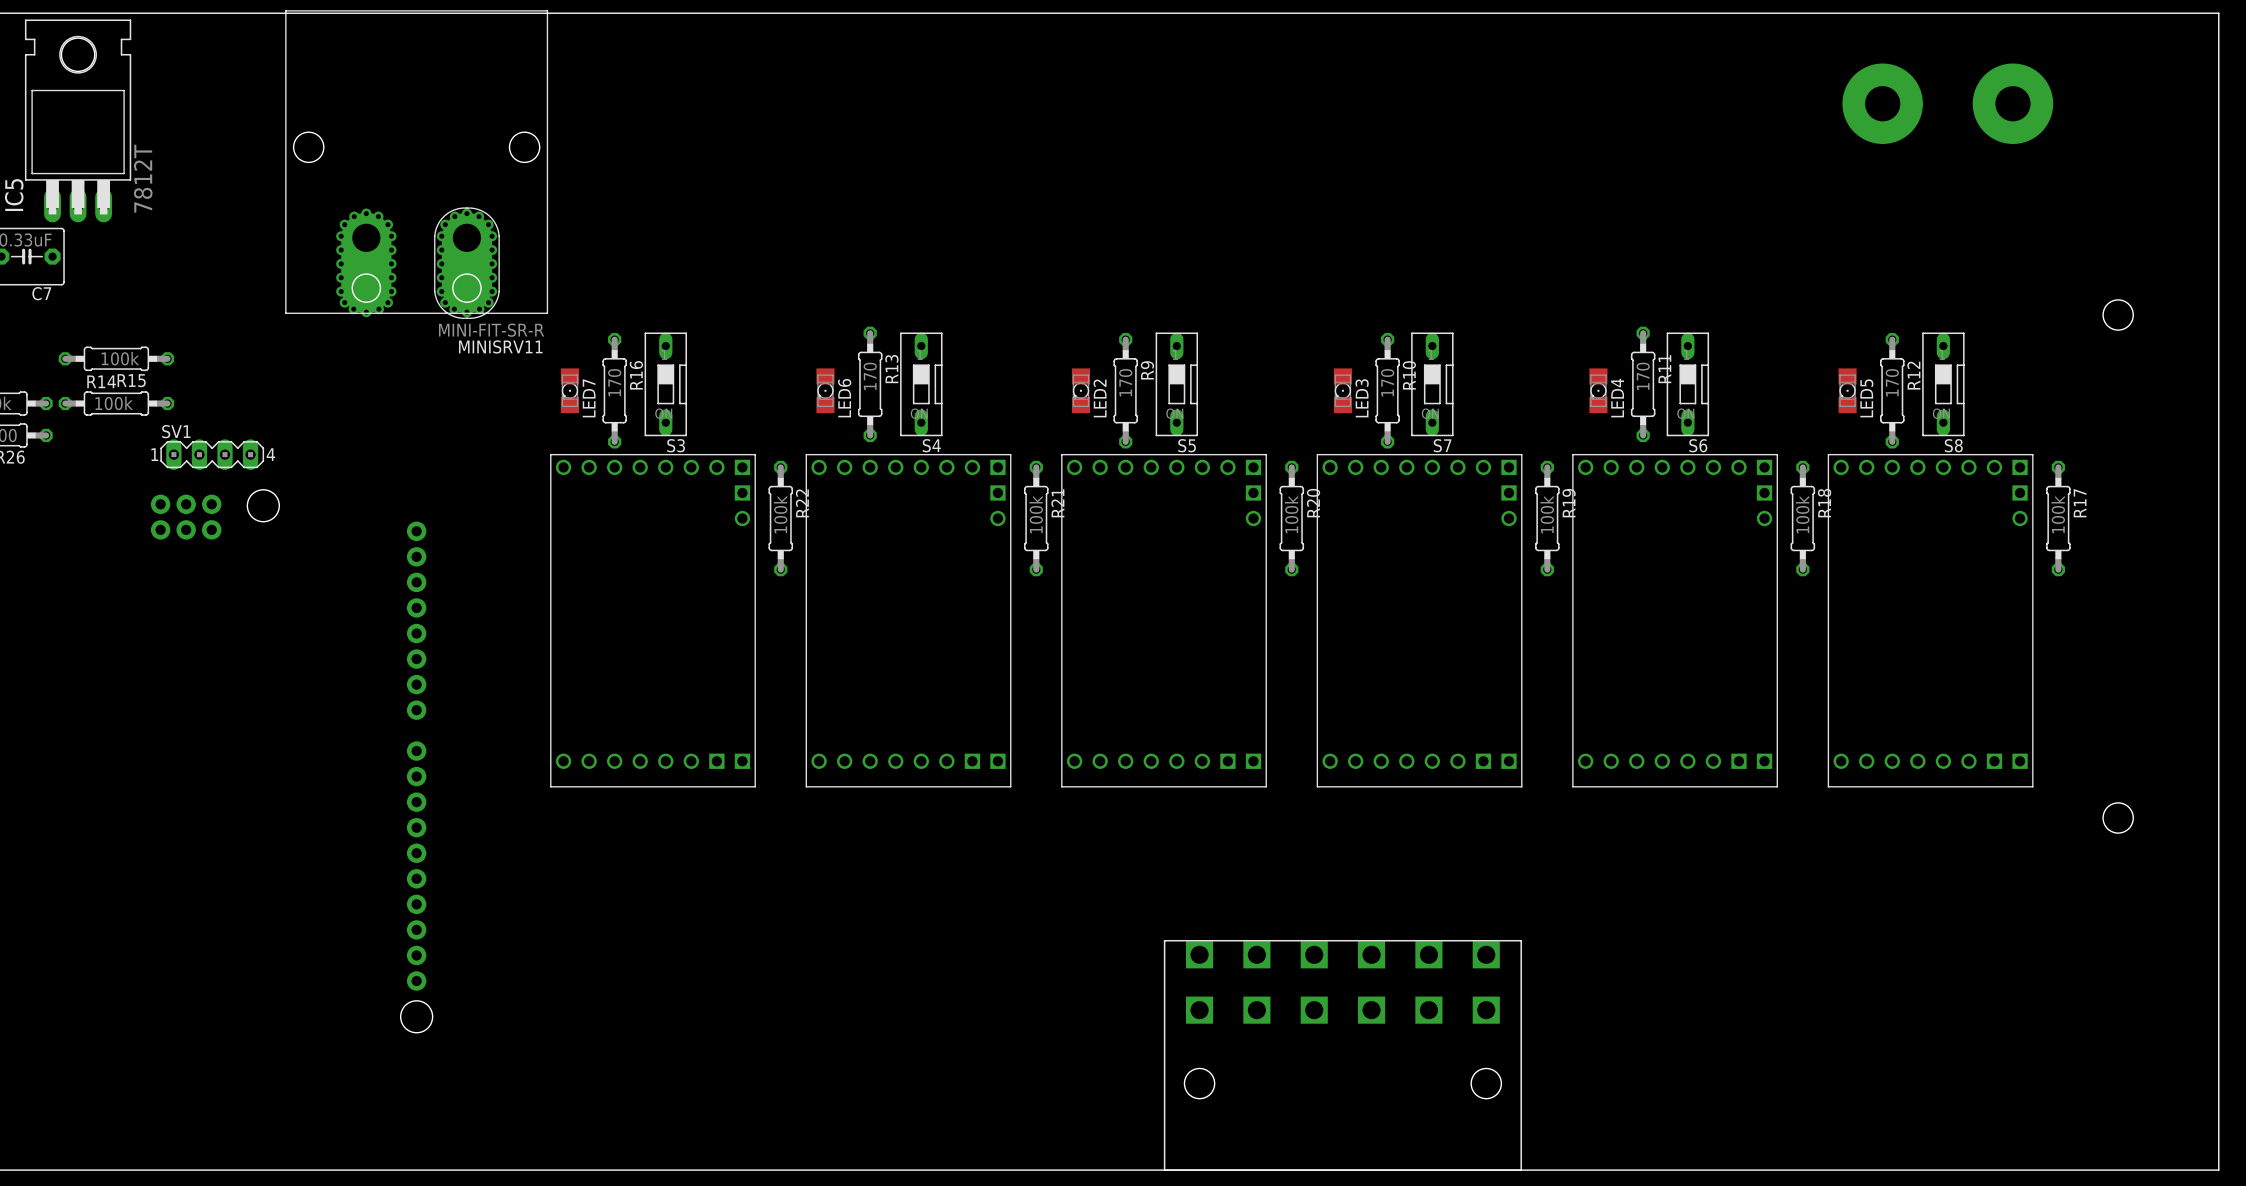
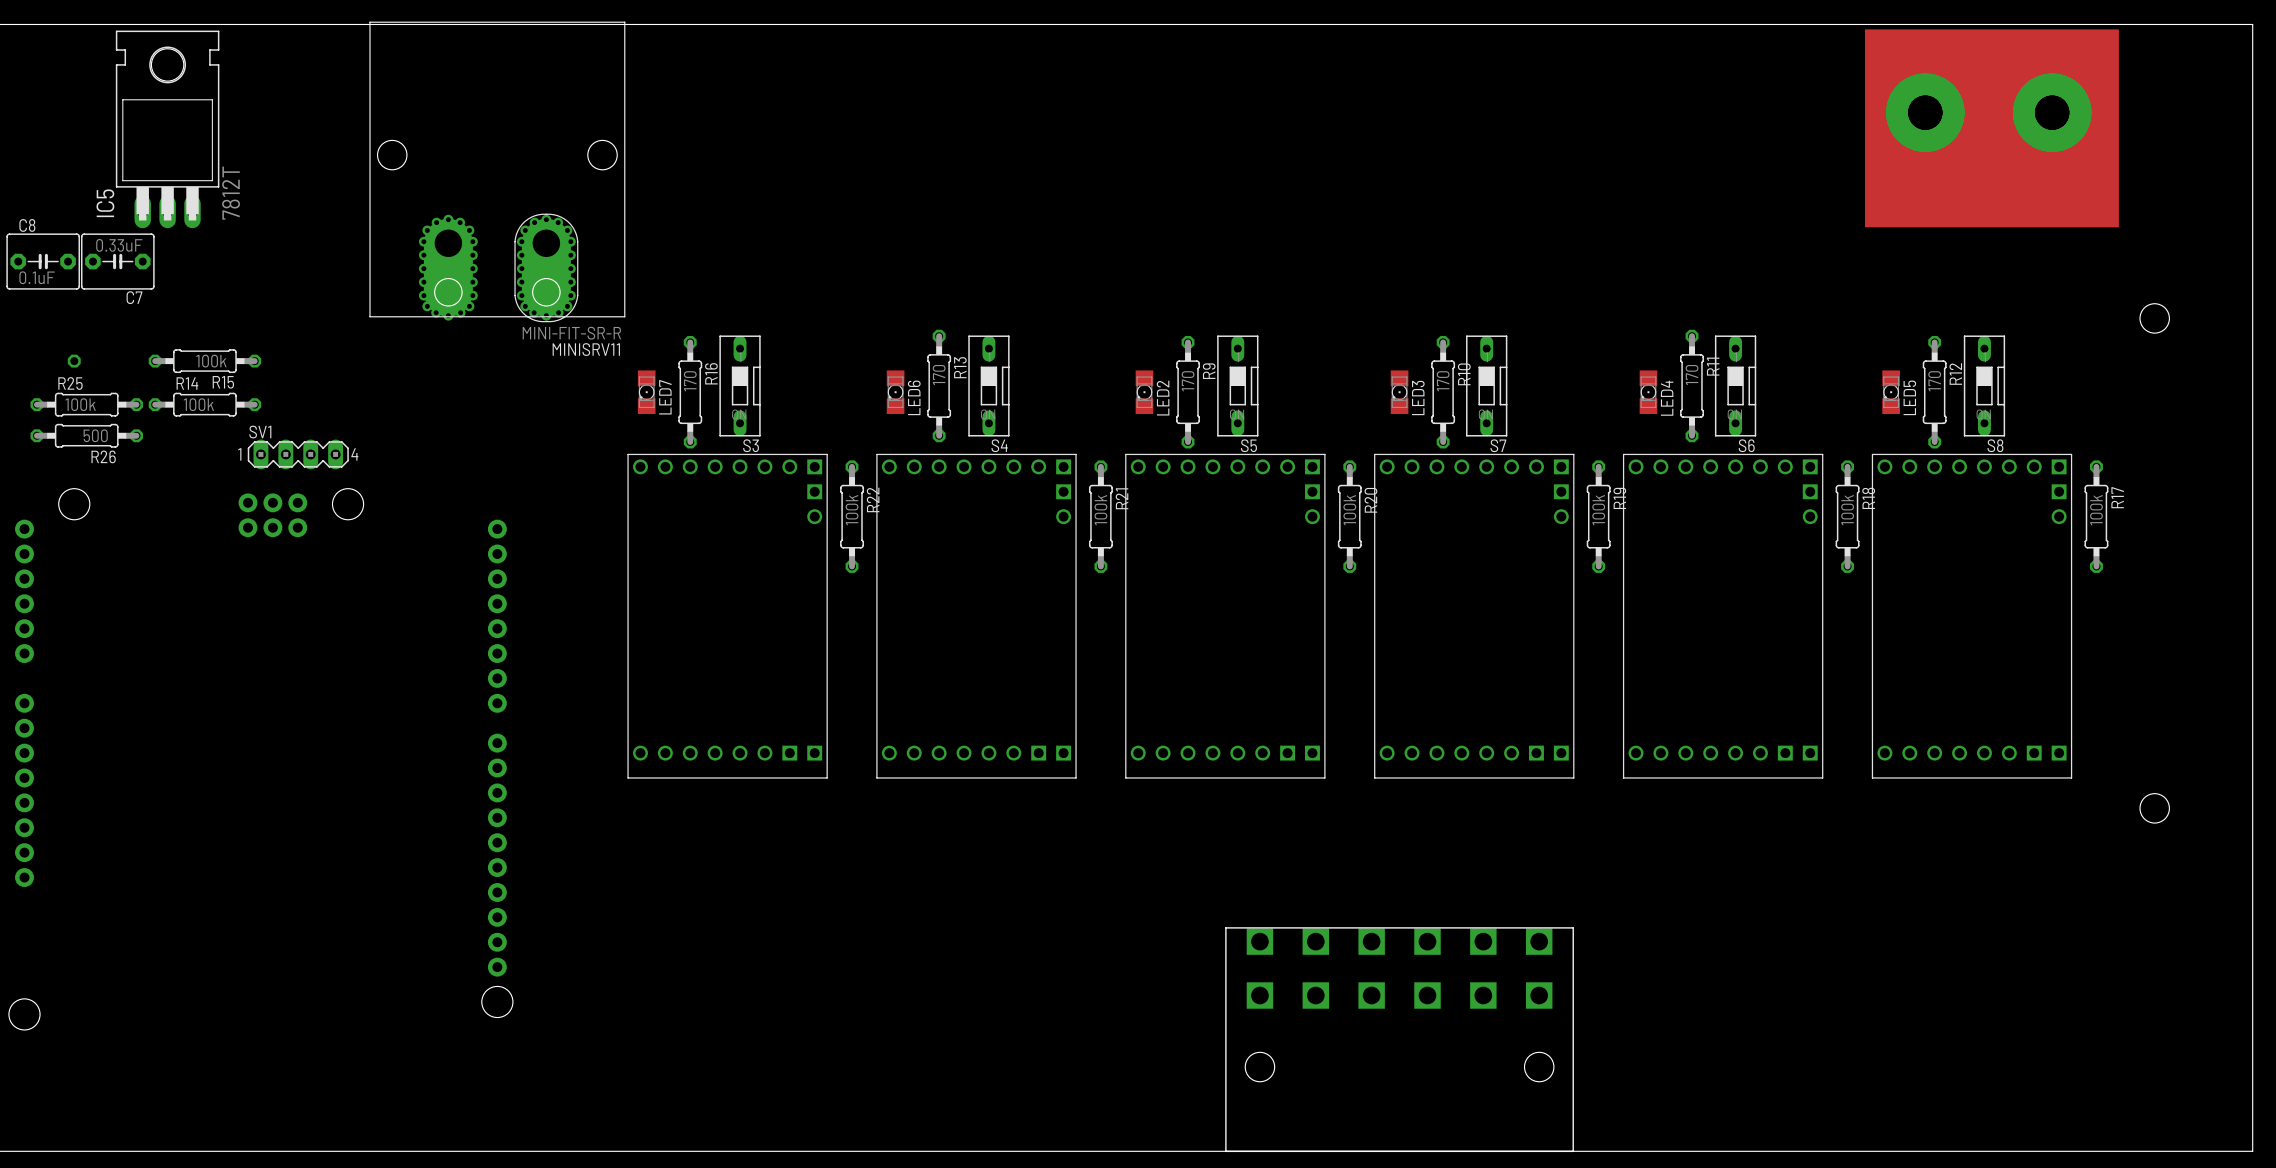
part: none -> (1991, 128)

